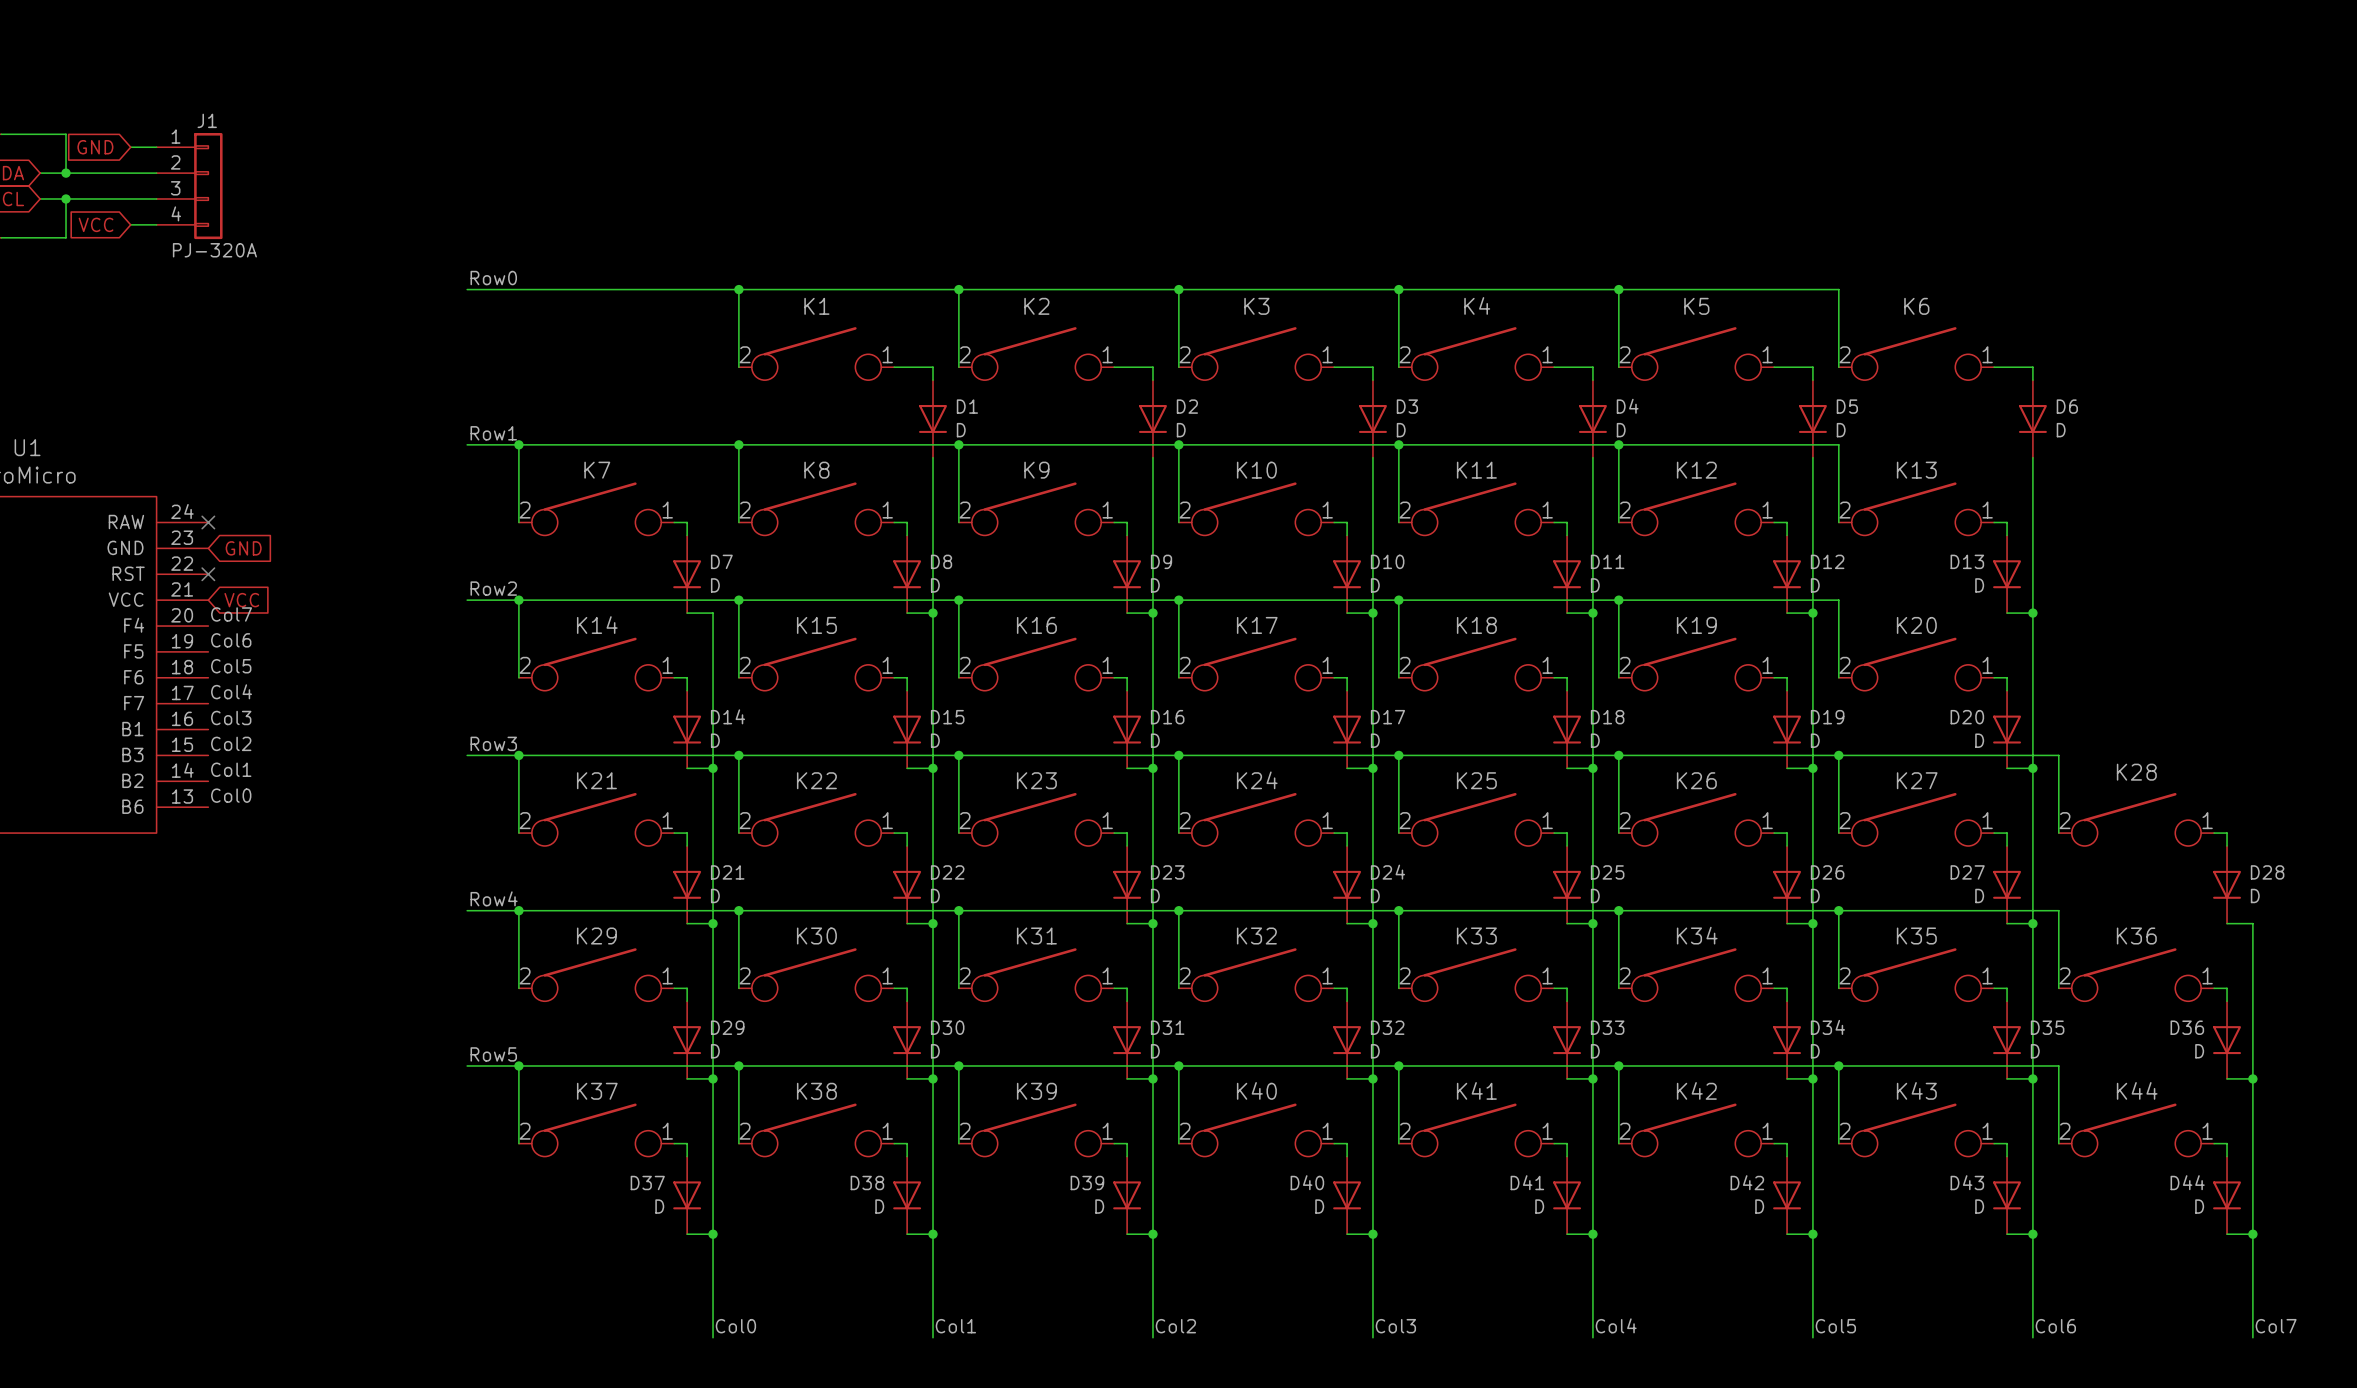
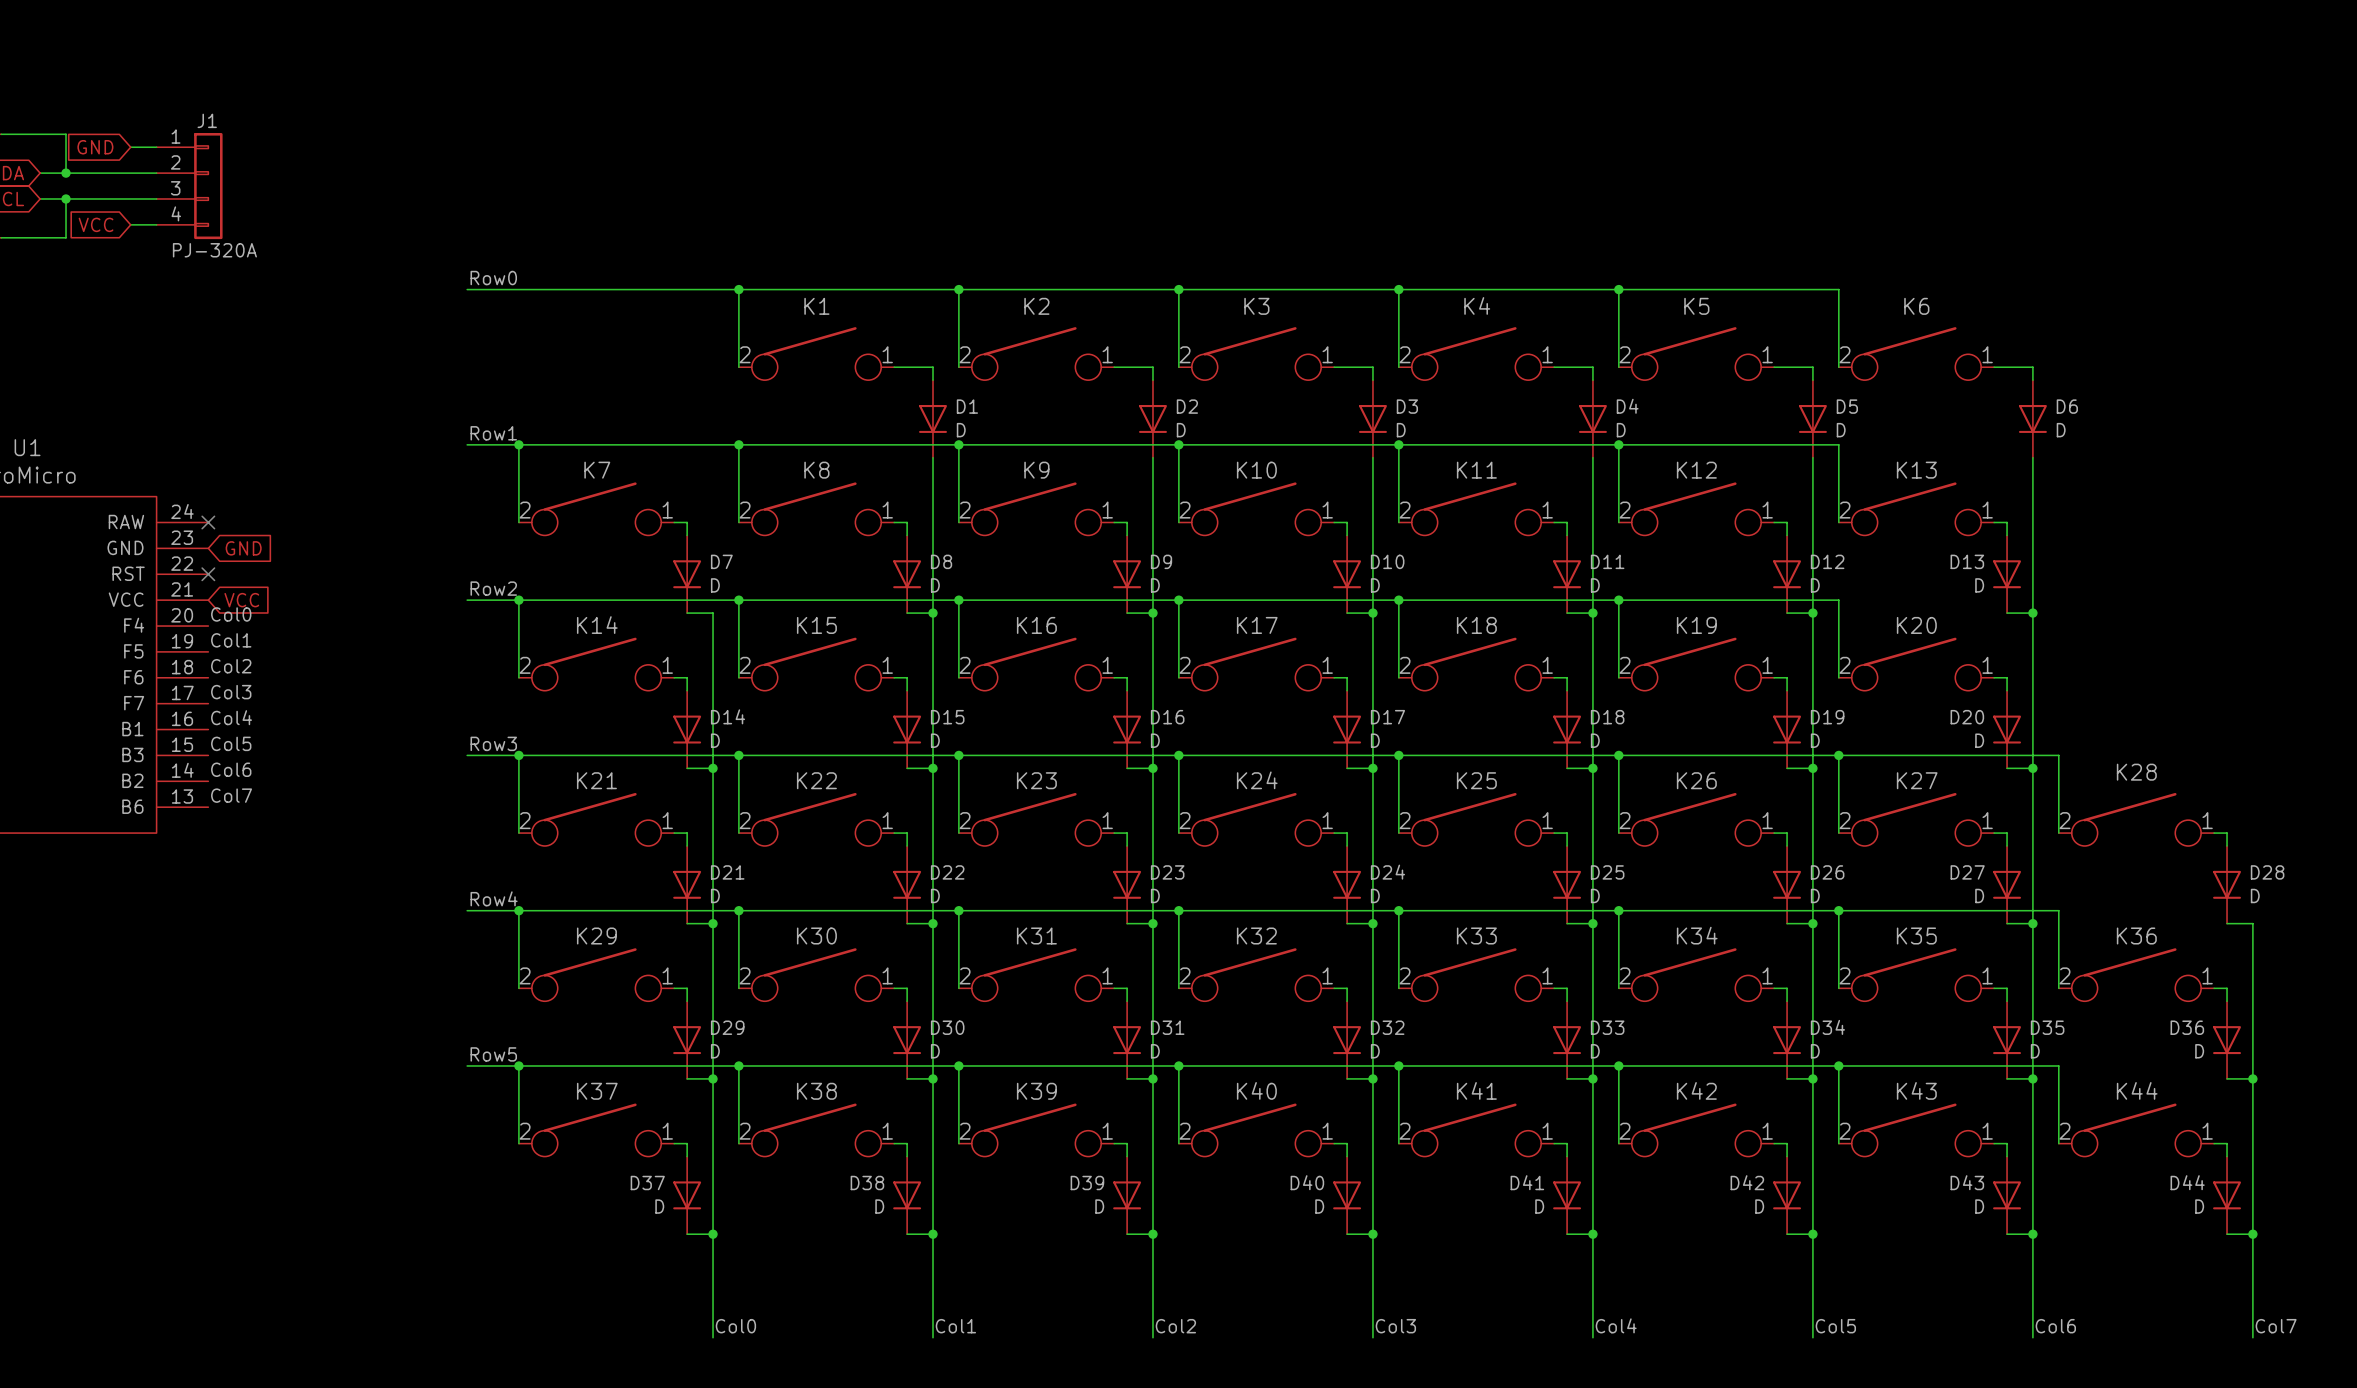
label: Col7 (231, 614) -> Col0 (231, 614)
label: Col6 (231, 640) -> Col1 (231, 640)
label: Col5 (231, 666) -> Col2 (231, 666)
label: Col4 (231, 691) -> Col3 (231, 692)
label: Col3 (231, 717) -> Col4 (231, 717)
label: Col2 (231, 743) -> Col5 (231, 743)
label: Col1 (231, 769) -> Col6 (231, 769)
label: Col0 (231, 795) -> Col7 (231, 795)

